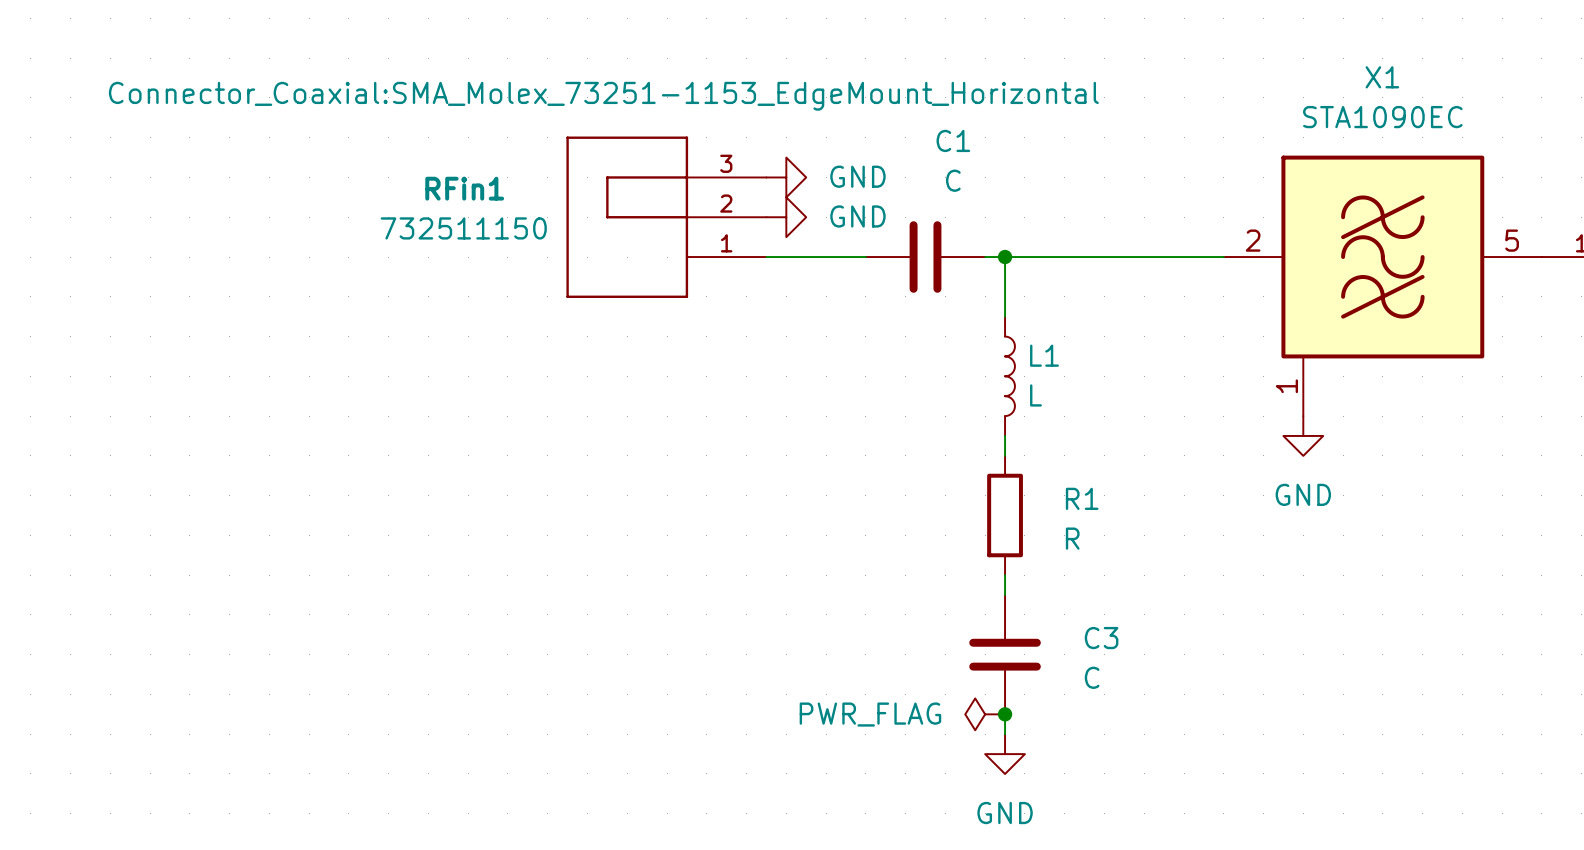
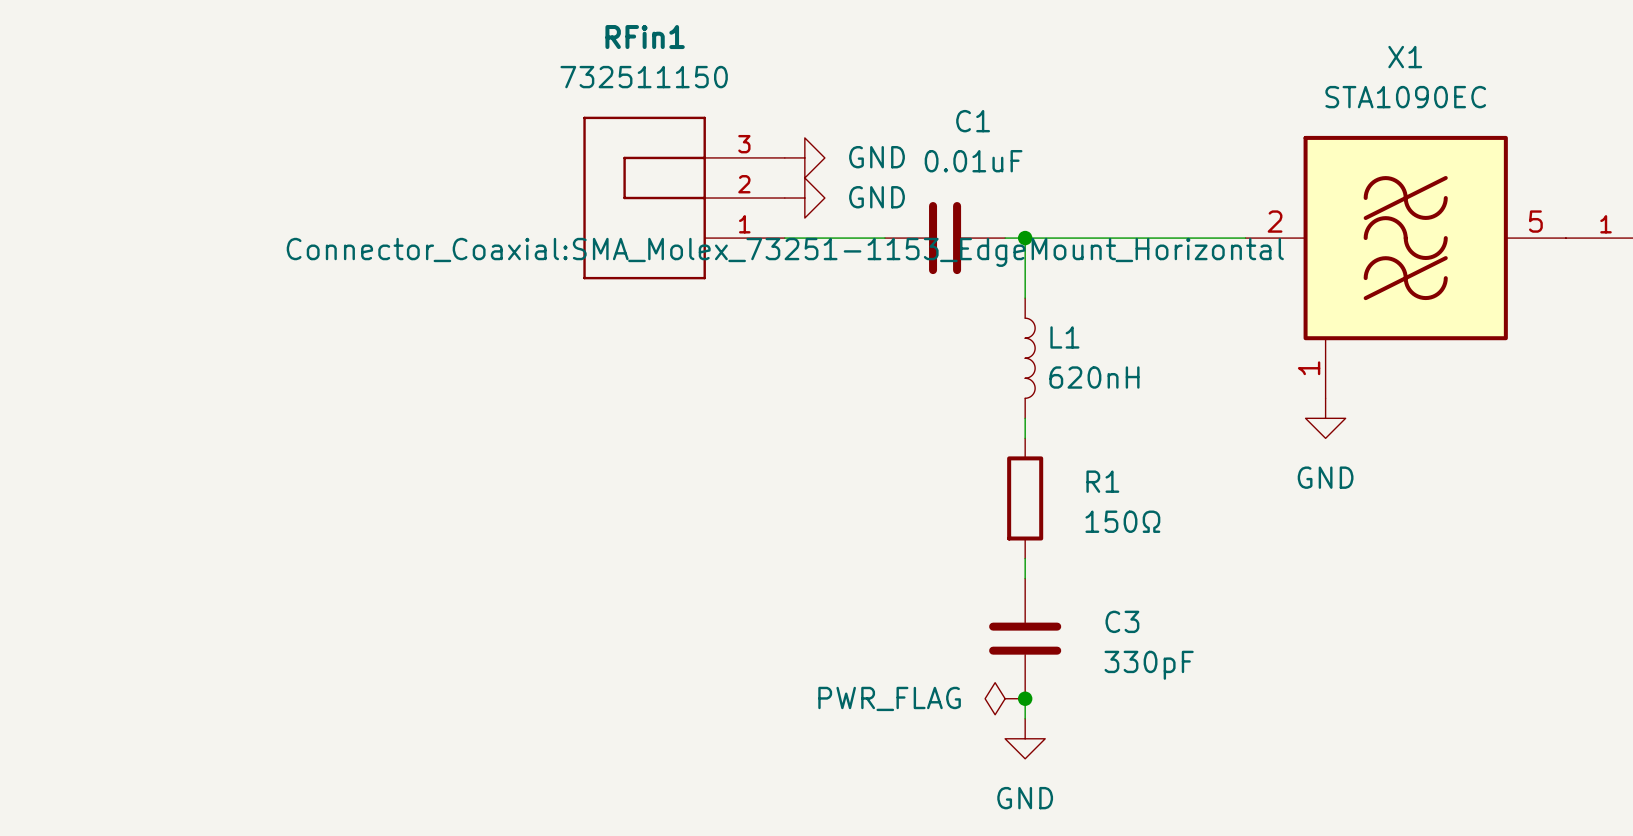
RFin1 text position: Connector_Coaxial:SMA_Molex_73251-1153_EdgeMount_Horizontal (603, 96) -> Connector_Coaxial:SMA_Molex_73251-1153_EdgeMount_Horizontal (785, 252)
C1 value: C (953, 180) -> 0.01uF (973, 161)
RFin1 name position: RFin1 (464, 188) -> RFin1 (645, 37)
RFin1 value position: 732511150 (463, 228) -> 732511150 (644, 77)
L1 value: L (1035, 395) -> 620nH (1094, 377)
R1 value: R (1072, 538) -> 150Ω (1122, 521)
C3 value: C (1092, 677) -> 330pF (1149, 665)

